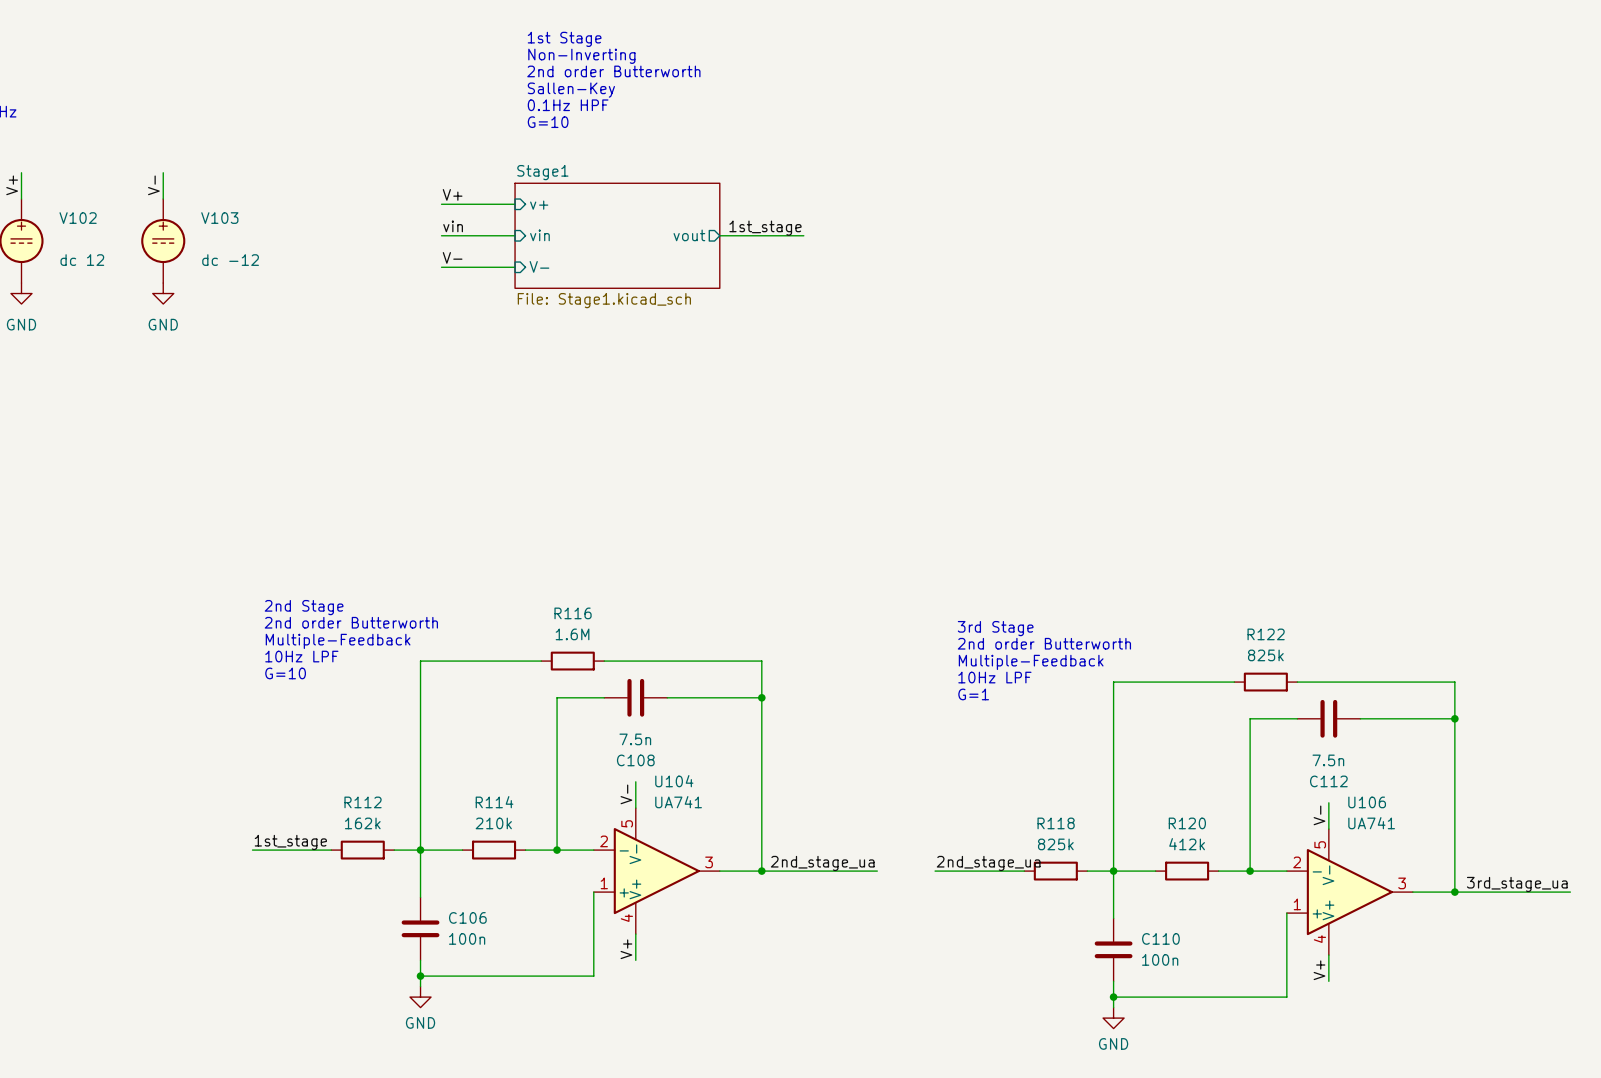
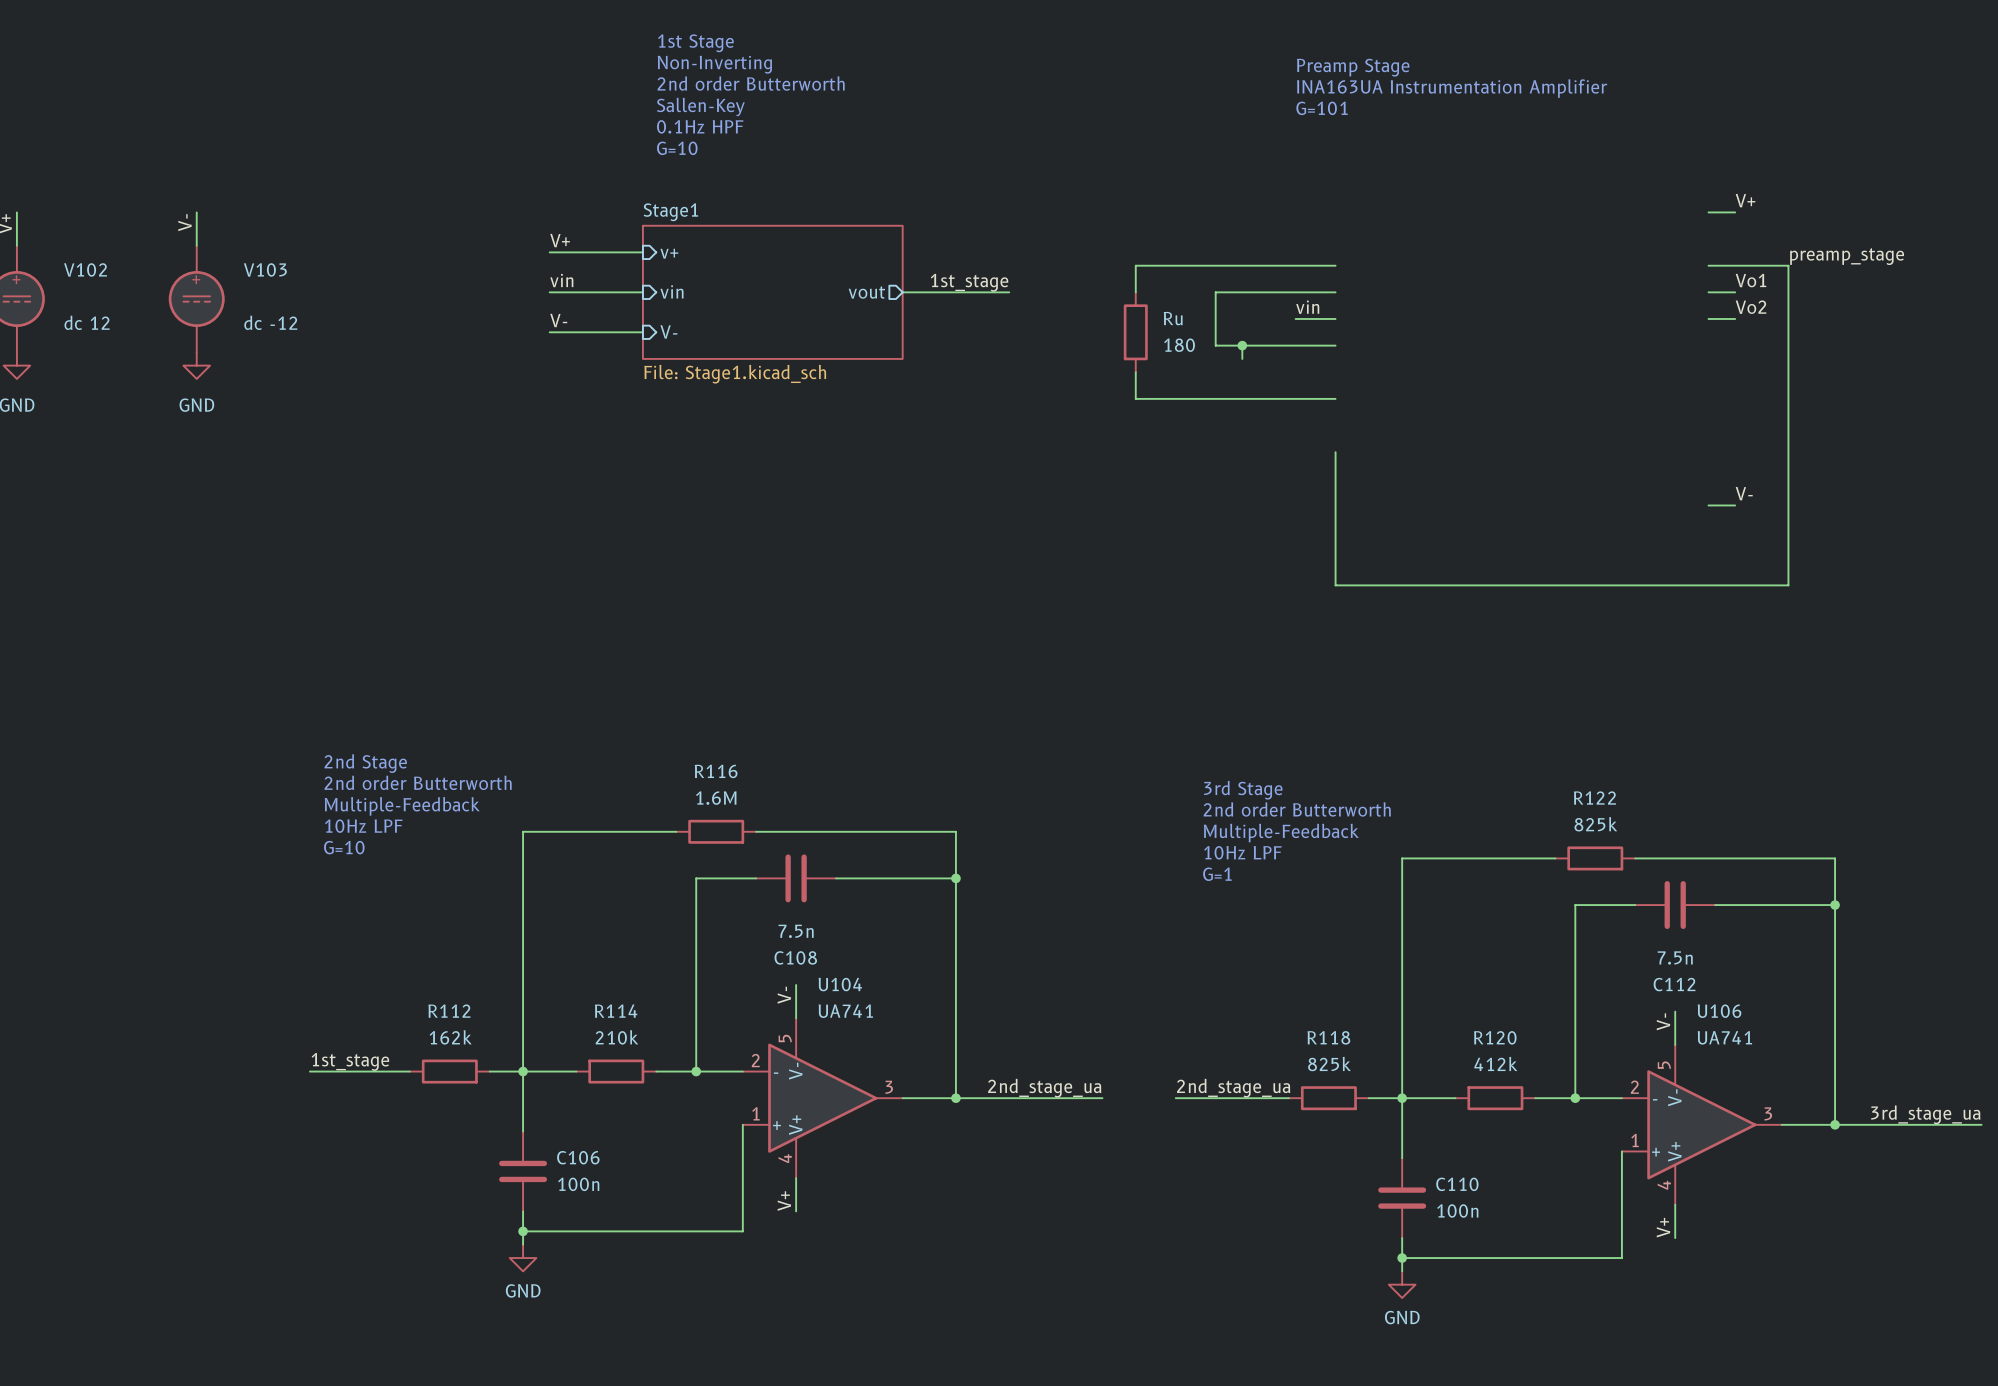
text: none -> Preamp Stage (1353, 67)
text: none -> INA163UA Instrumentation Amplifier (1452, 88)
text: none -> G=101 (1322, 108)
label: none -> V+ (1745, 200)
wire: none -> (1708, 212) (1735, 212)
label: none -> preamp_stage (1847, 256)
wire: none -> (1335, 265) (1135, 265) (1135, 292)
wire: none -> (1708, 265) (1788, 265) (1788, 585) (1335, 585) (1335, 452)
label: none -> Vo1 (1751, 280)
wire: none -> (1335, 292) (1215, 292) (1215, 345) (1335, 345)
wire: none -> (1708, 292) (1735, 292)
label: none -> vin (1307, 307)
label: none -> Vo2 (1751, 307)
wire: none -> (1295, 318) (1335, 318)
wire: none -> (1708, 318) (1735, 318)
Ru: none -> 180 (1135, 332)
wire: none -> (1242, 345) (1242, 358)
junction: none -> (1242, 345)
wire: none -> (1135, 372) (1135, 398) (1335, 398)
label: none -> V- (1744, 493)
wire: none -> (1708, 505) (1735, 505)

